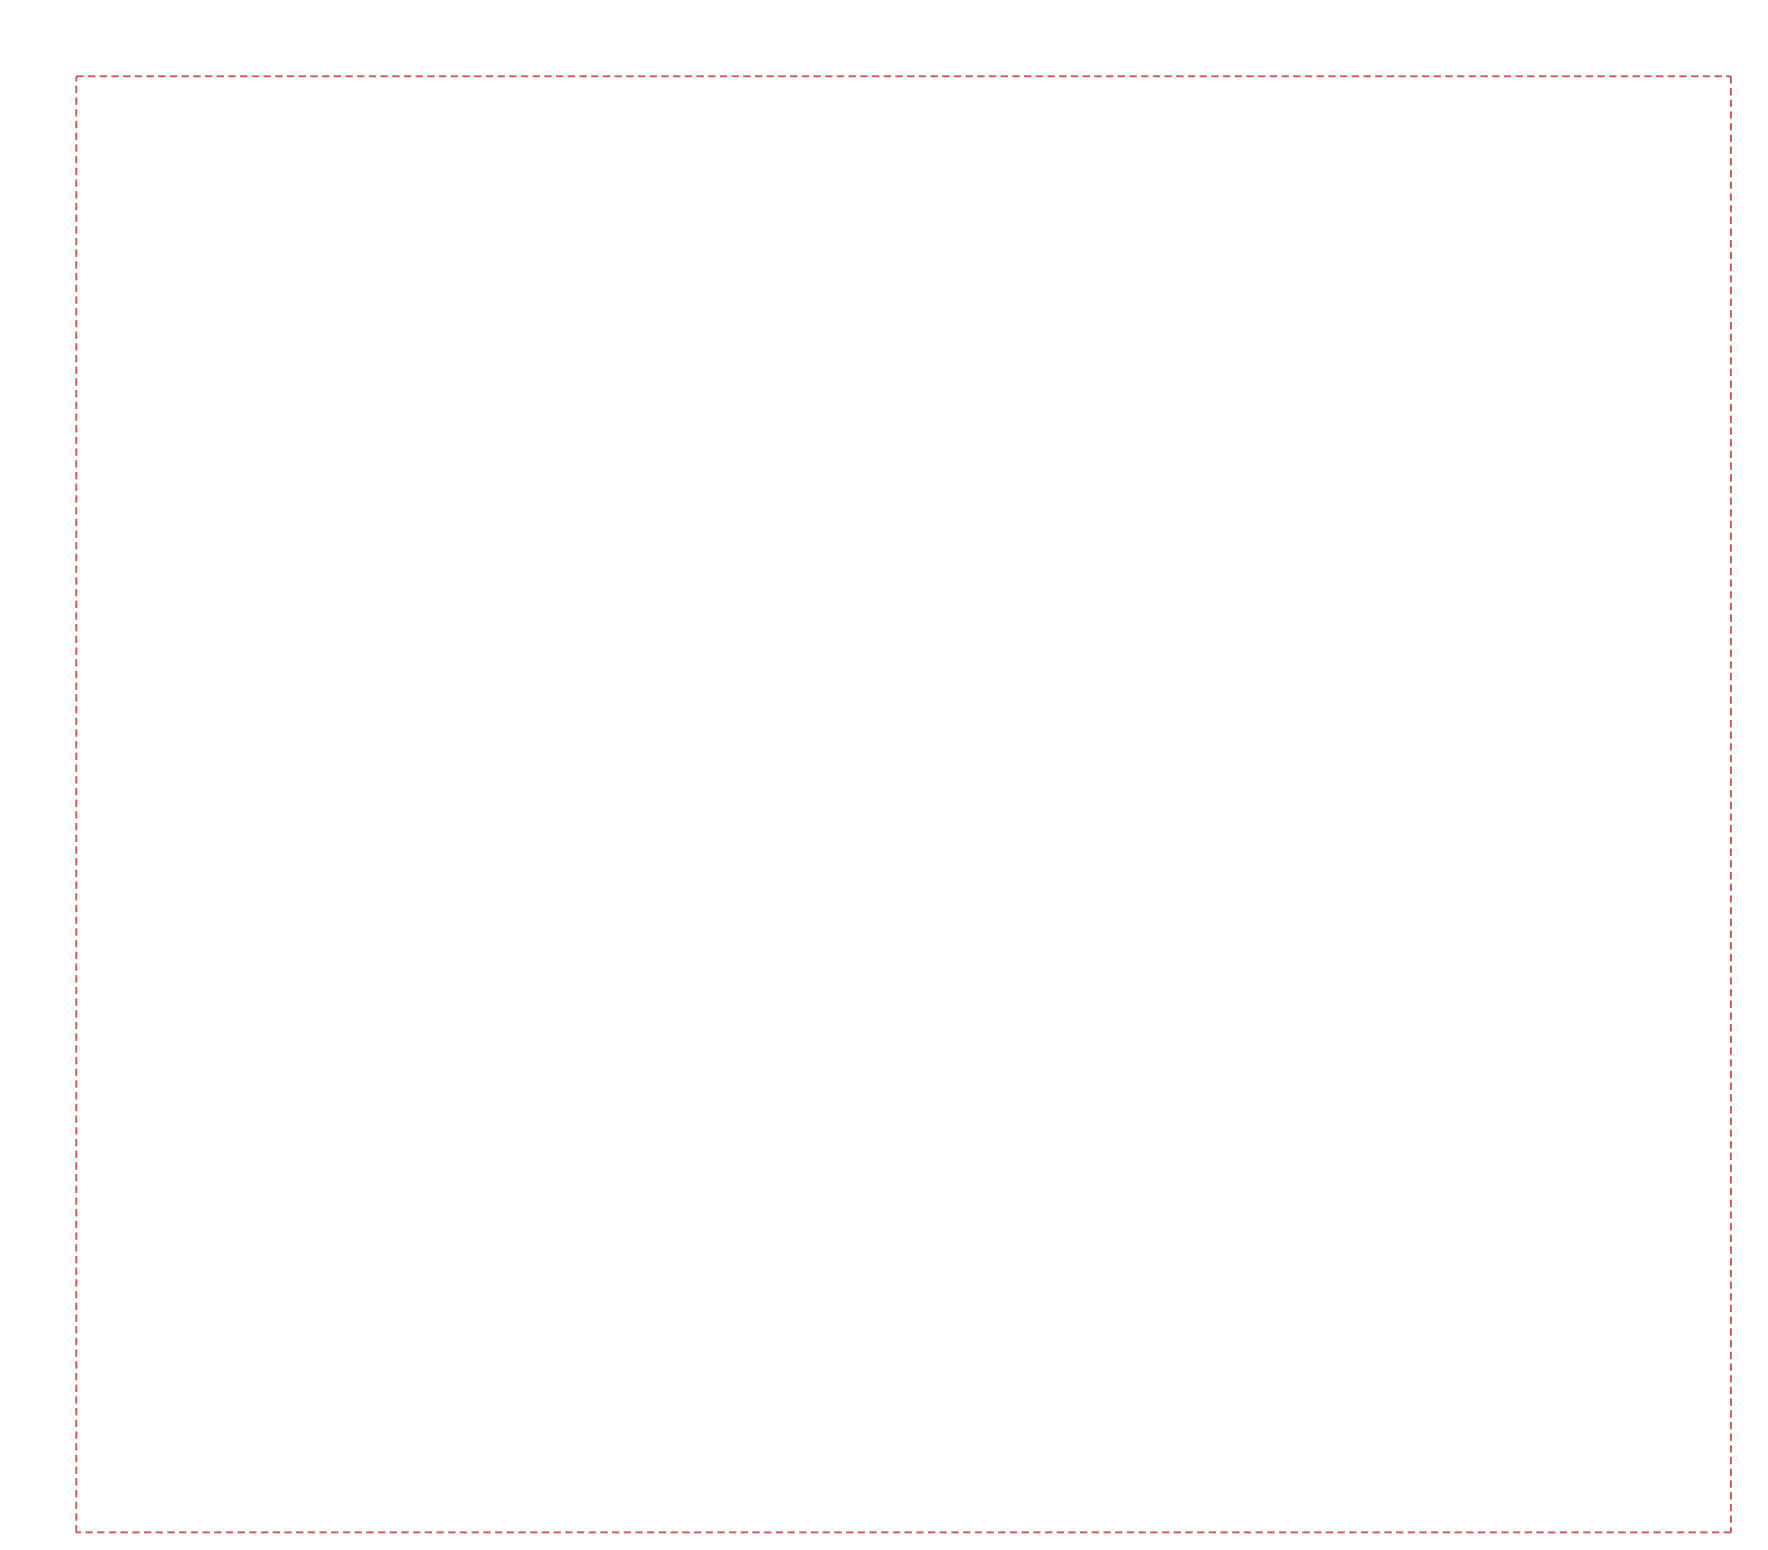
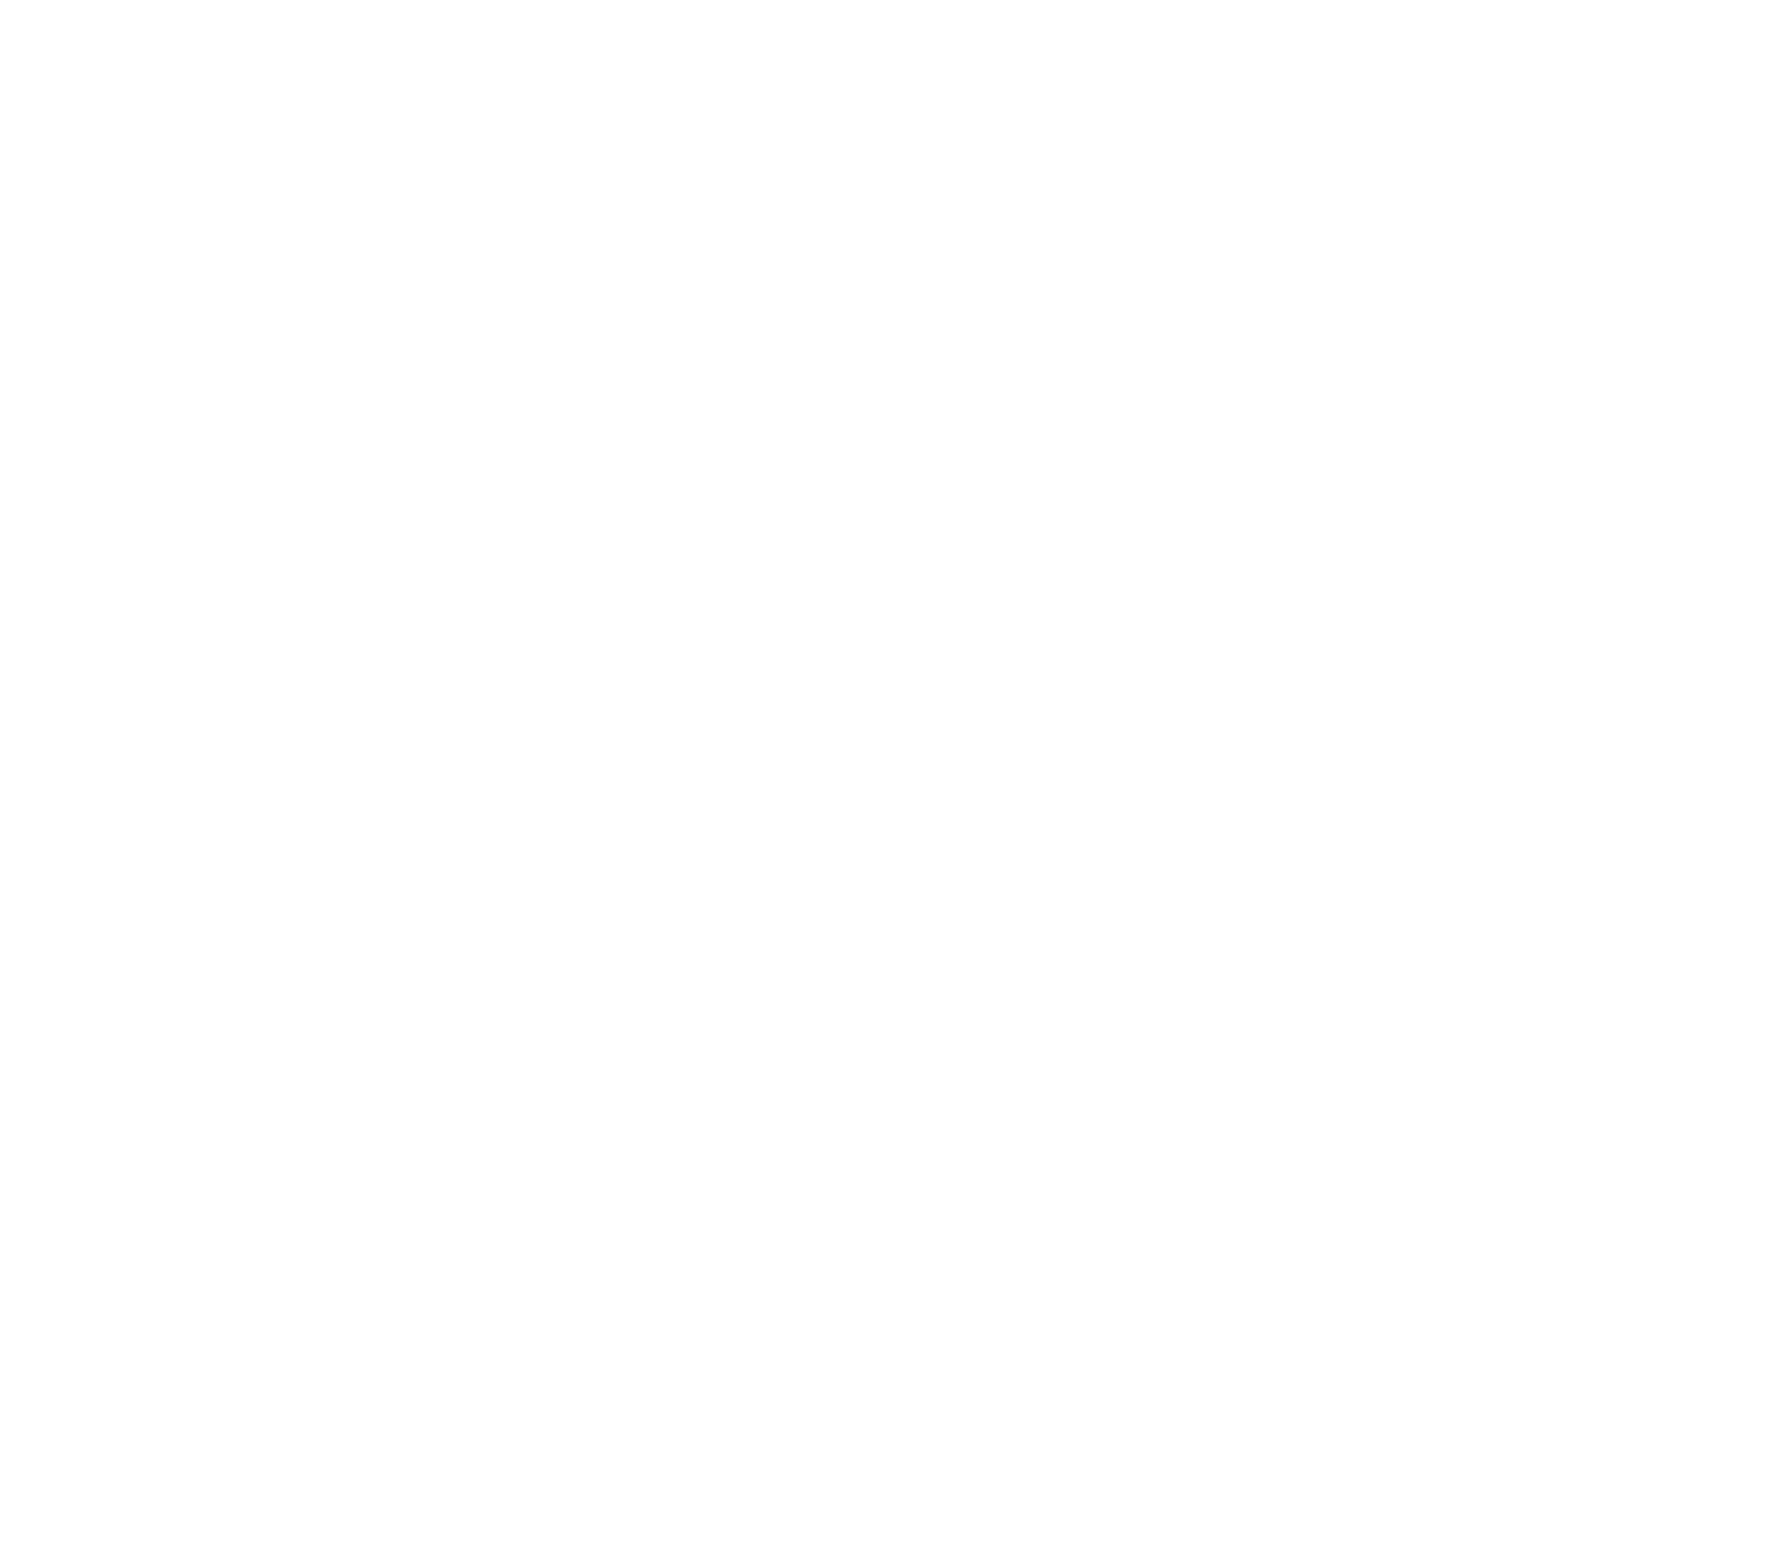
zone outline: (76, 76) (1730, 76) (1730, 1532) (76, 1532) (76, 76) -> none

